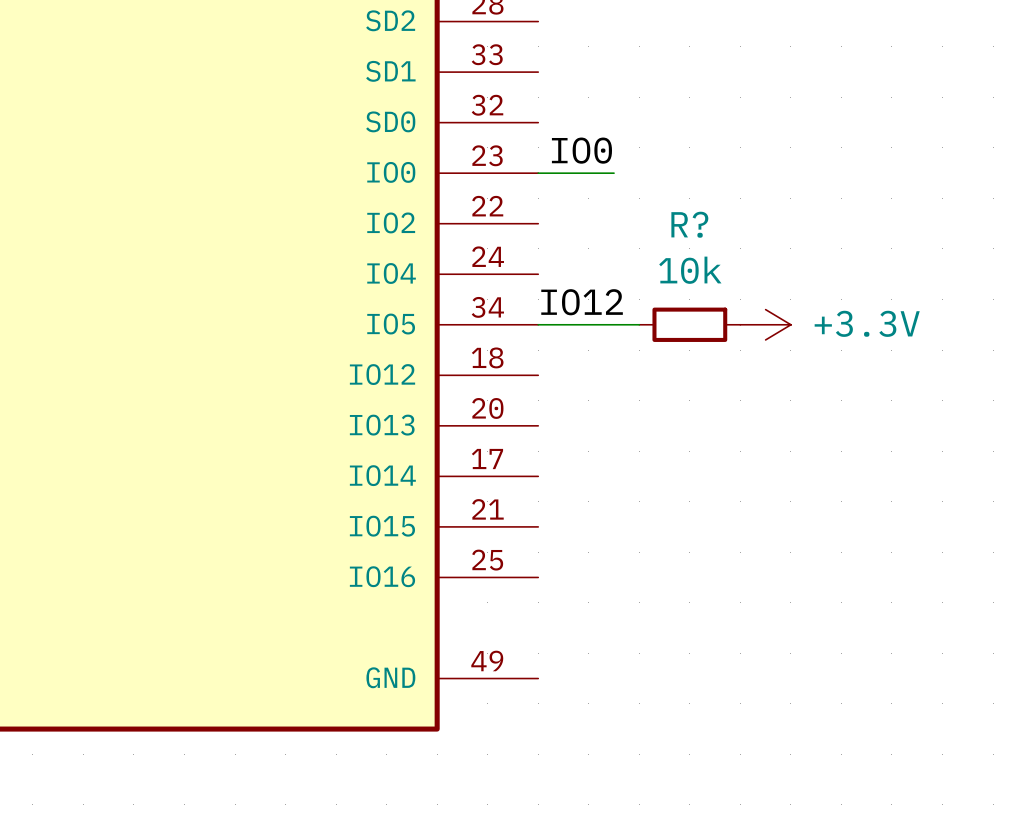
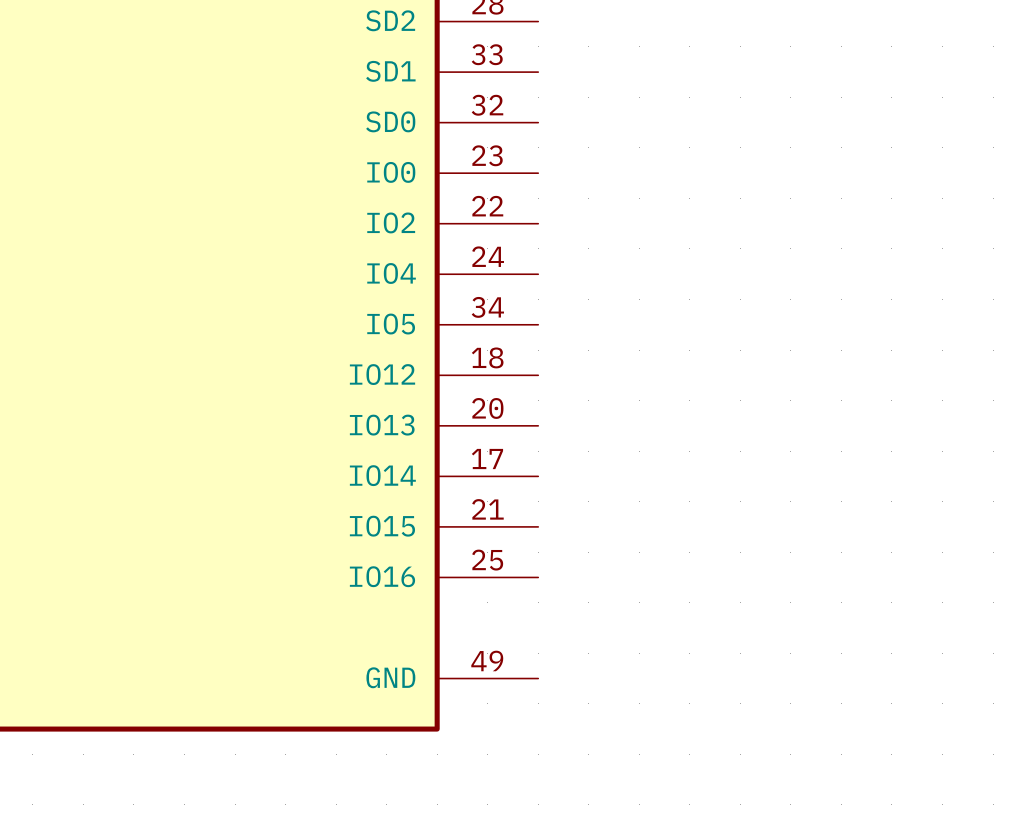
label: IO0 (581, 150) -> none
wire: (538, 173) (614, 173) -> none
label: IO12 (582, 302) -> none
wire: (538, 324) (639, 324) -> none
R?: 10k (689, 324) -> none
power symbol: +3.3V (765, 324) -> none

